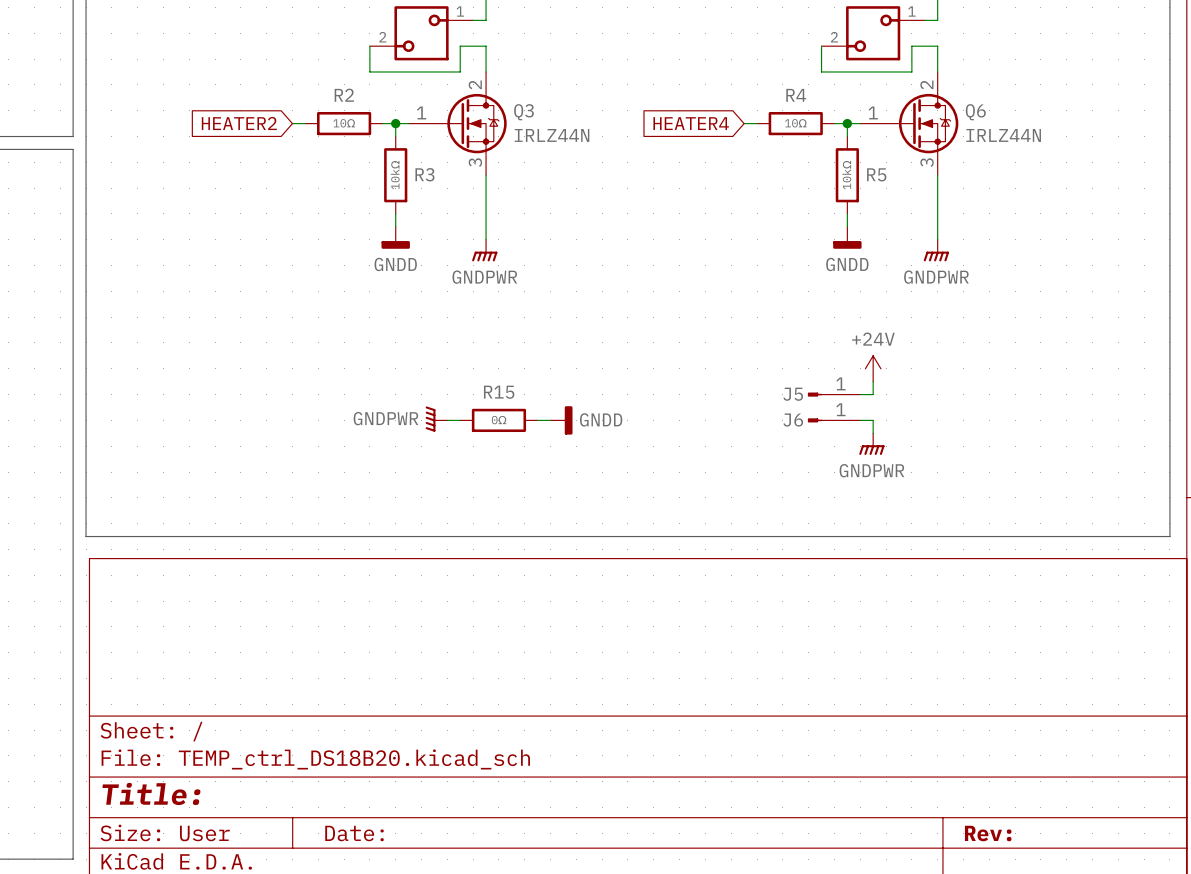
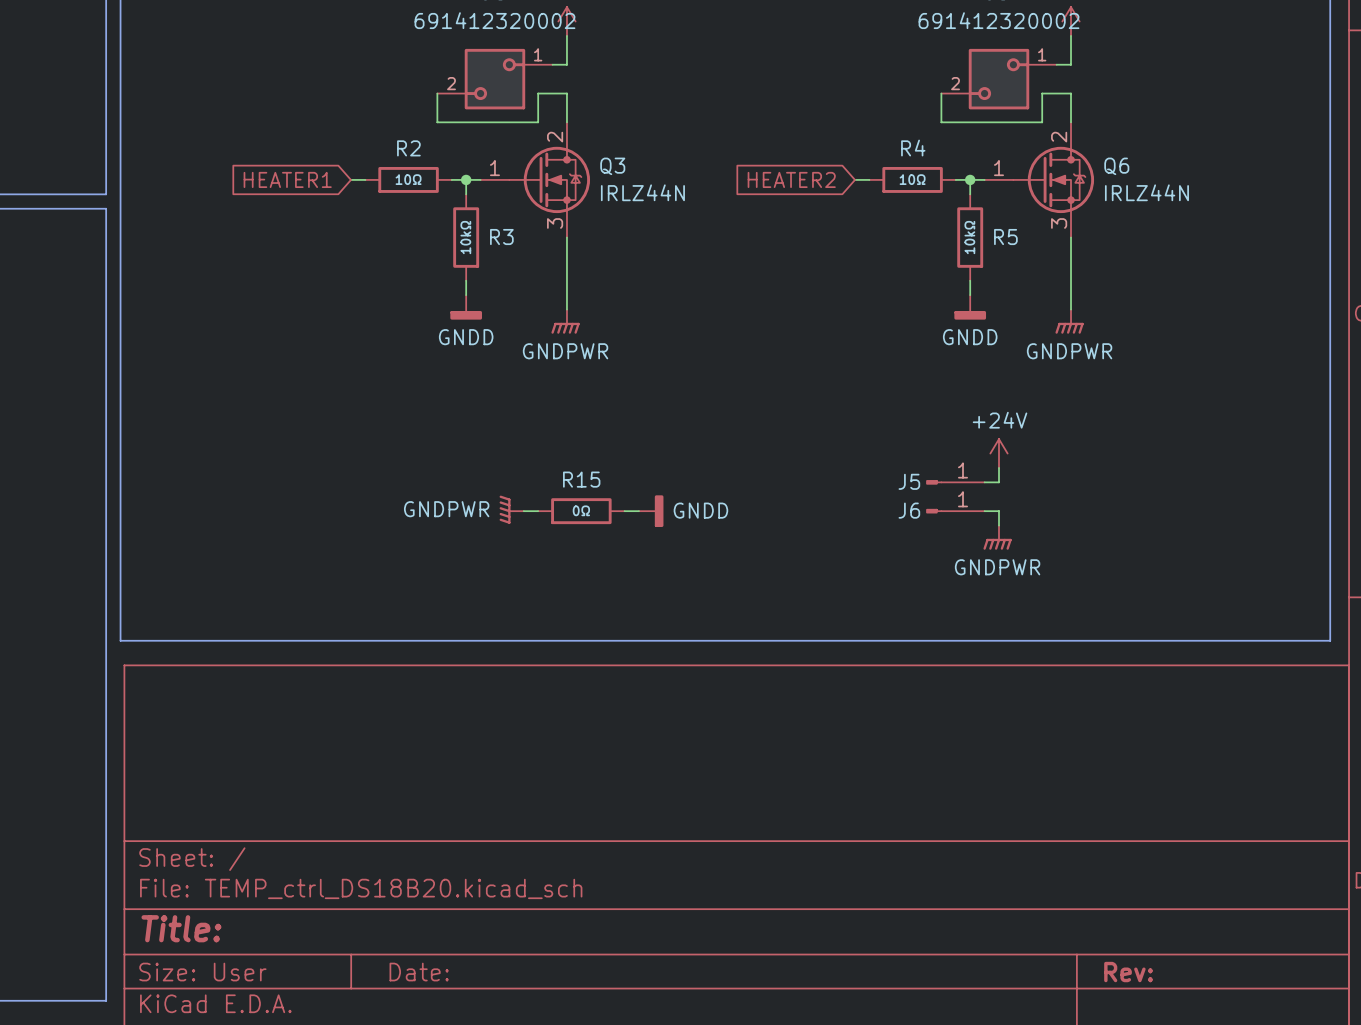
global label: HEATER2 (239, 123) -> HEATER1 (287, 179)
global label: HEATER4 (691, 123) -> HEATER2 (791, 179)

